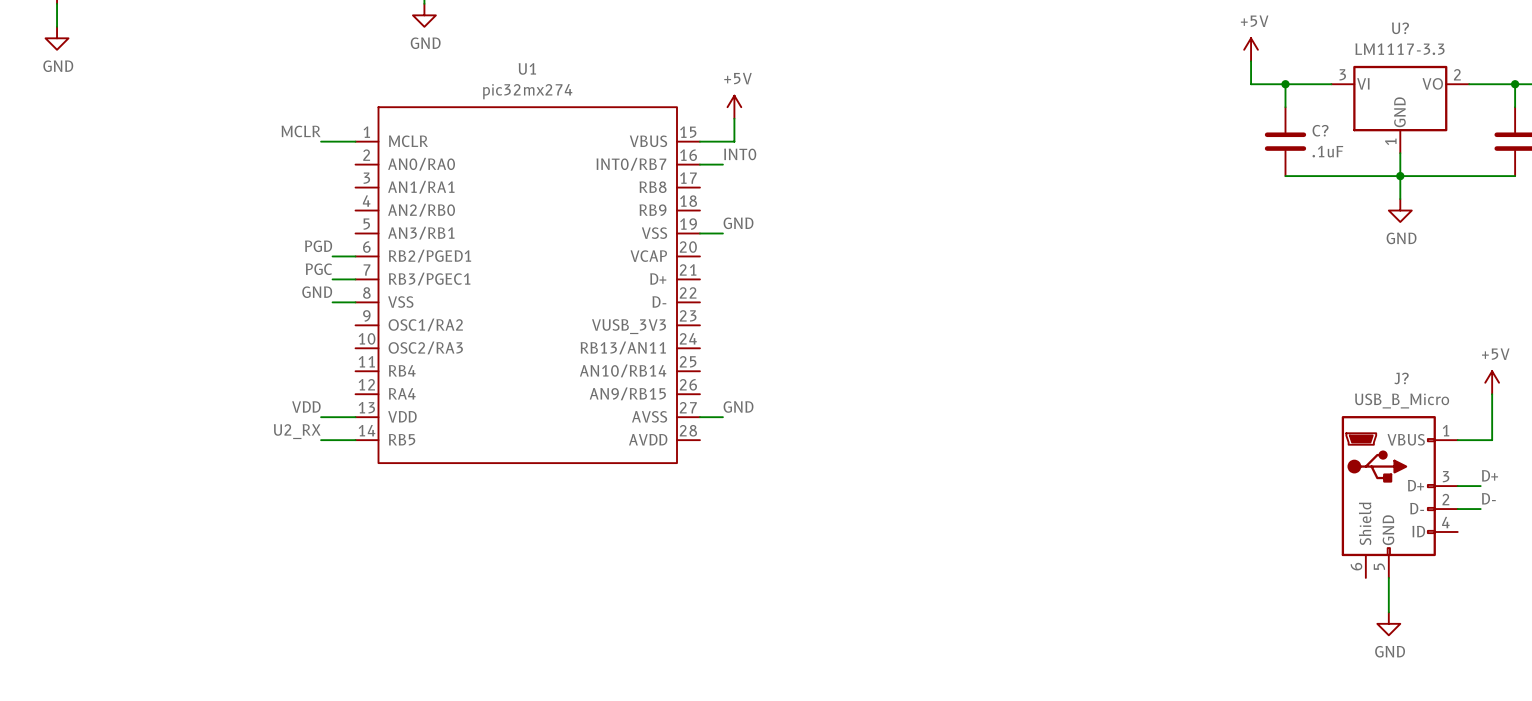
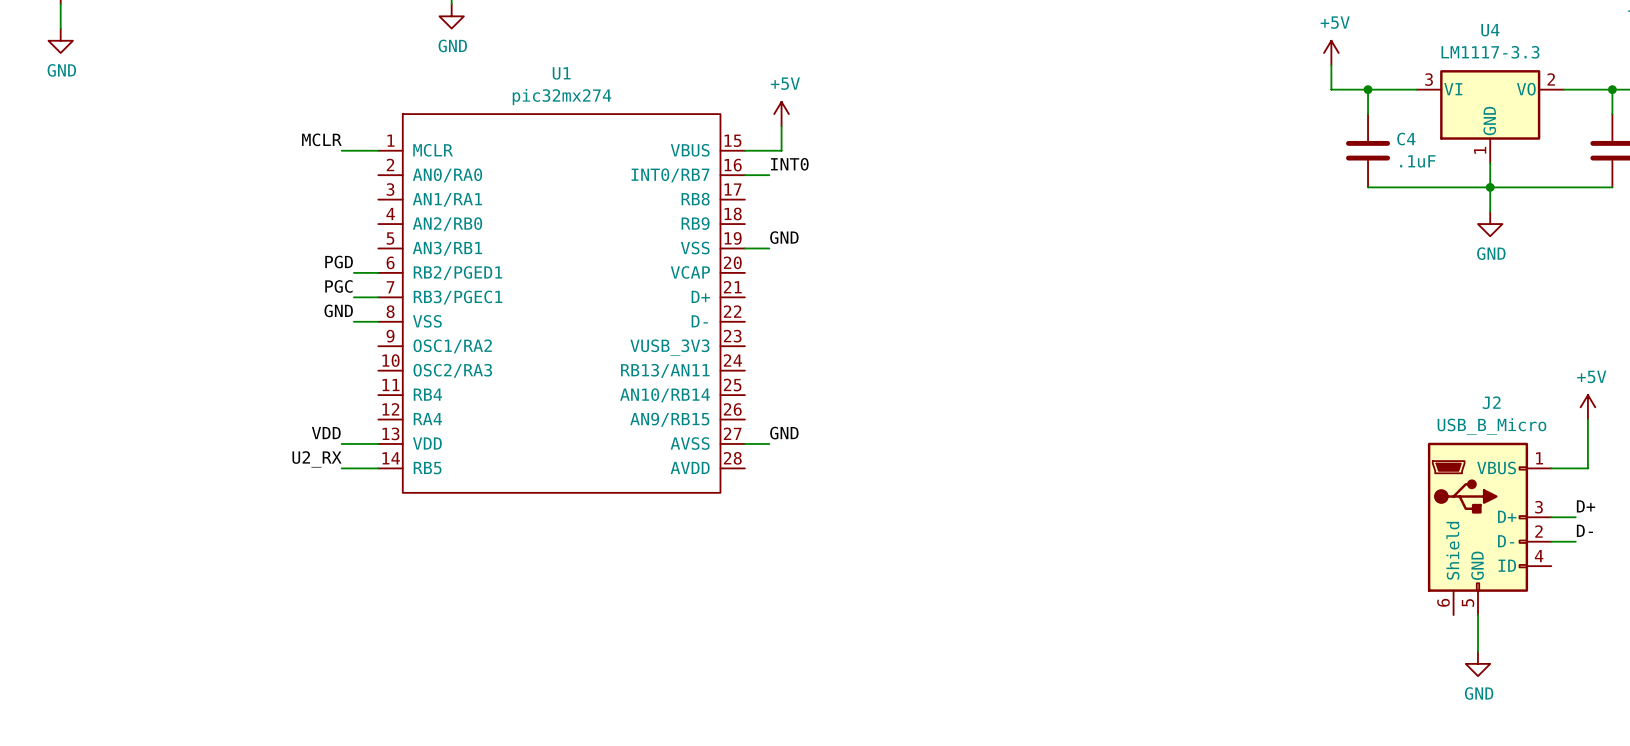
U? name: U? (1400, 28) -> U4 (1490, 30)
C? name: C? (1320, 130) -> C4 (1406, 139)
J? name: J? (1401, 378) -> J2 (1491, 402)

